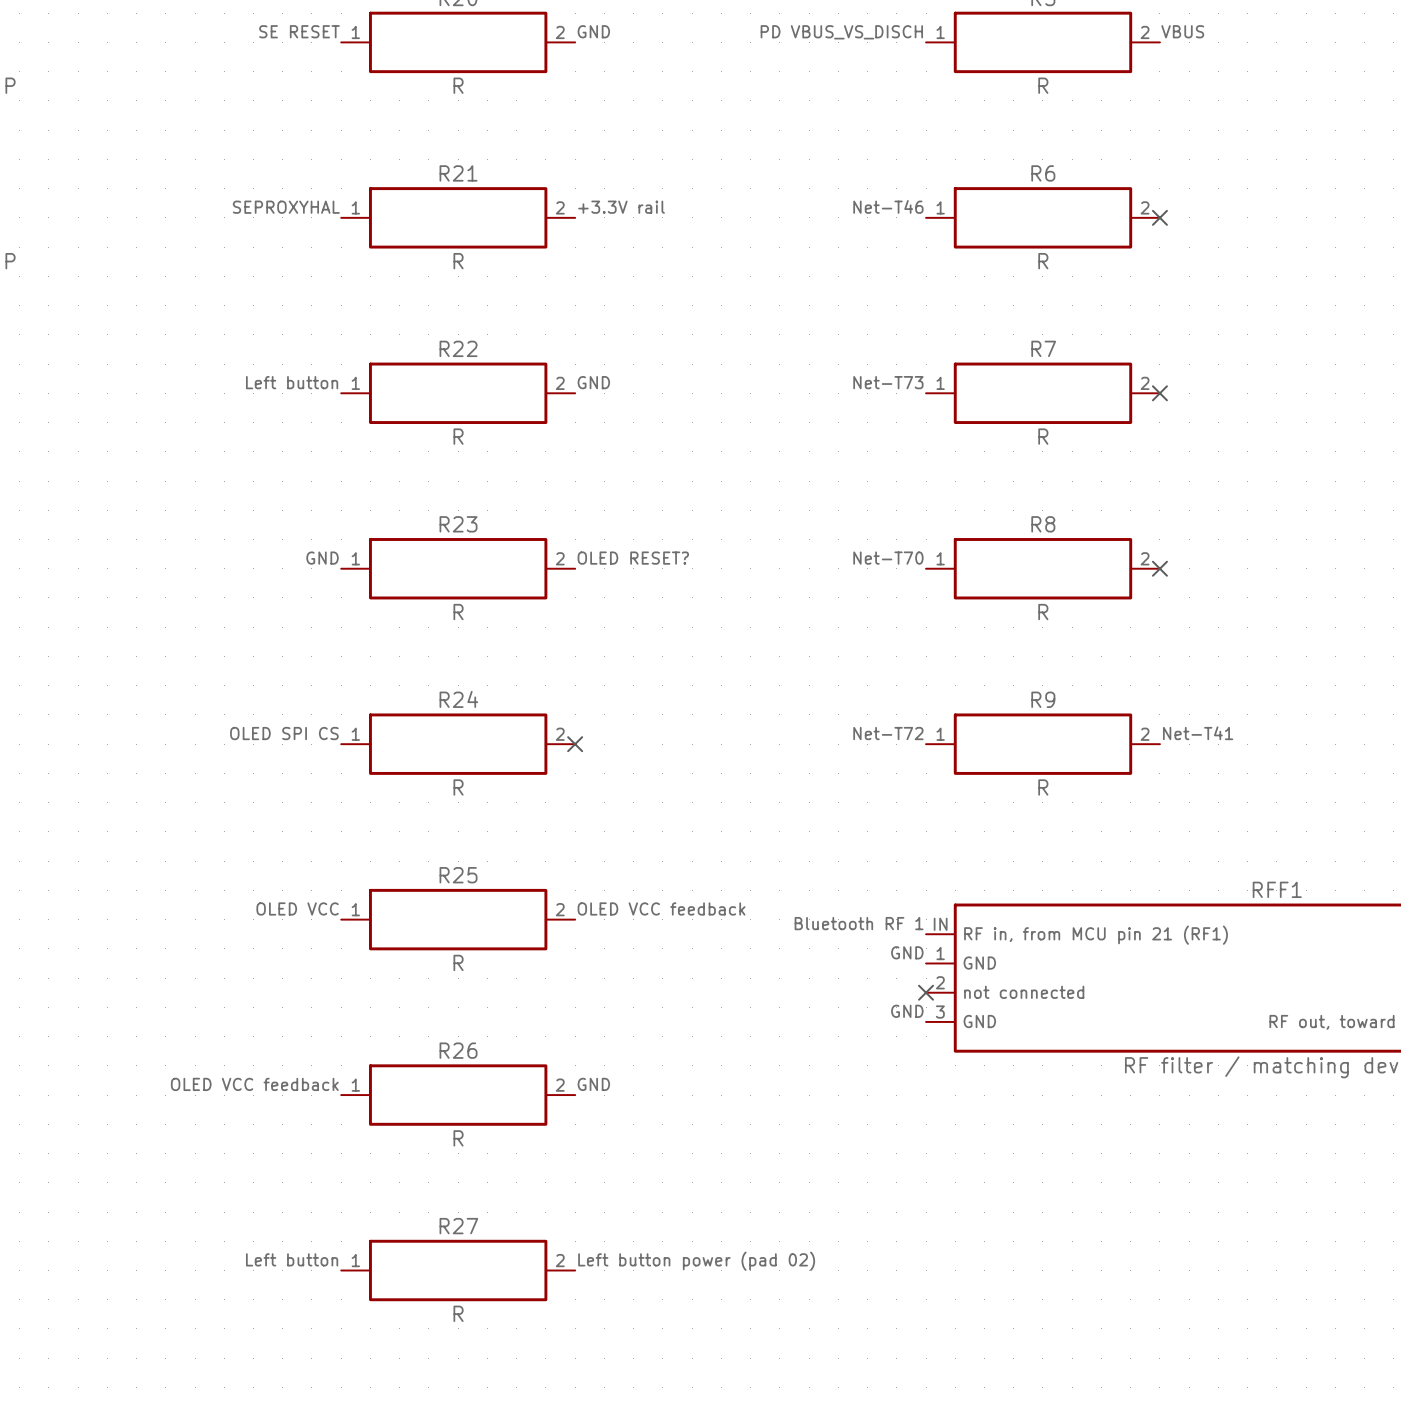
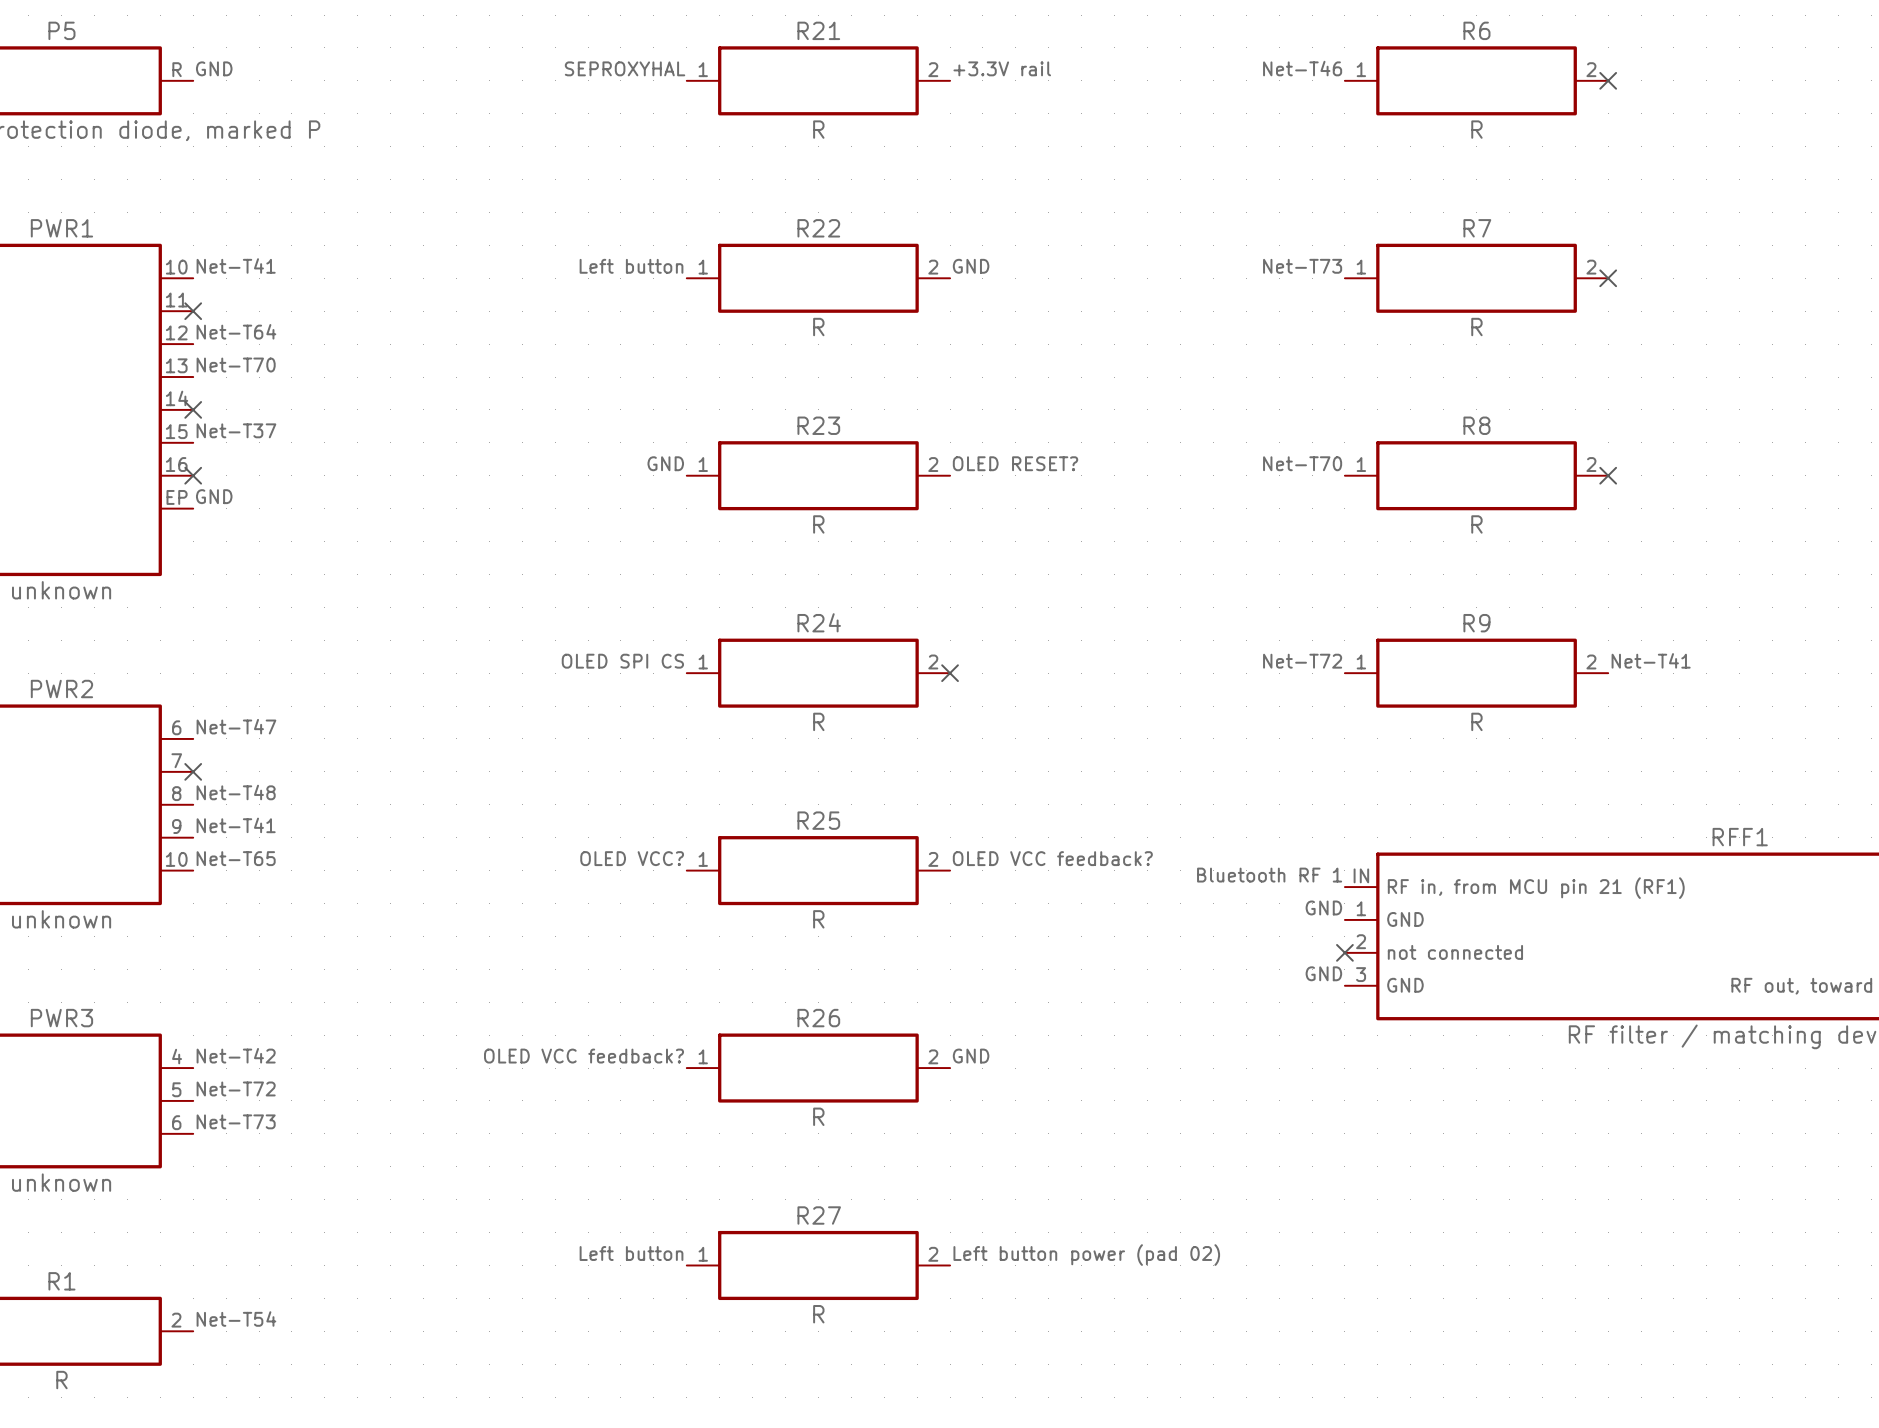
label: OLED VCC (297, 908) -> OLED VCC? (632, 858)
label: OLED VCC feedback (661, 908) -> OLED VCC feedback? (1052, 858)
label: OLED VCC feedback (254, 1084) -> OLED VCC feedback? (584, 1056)

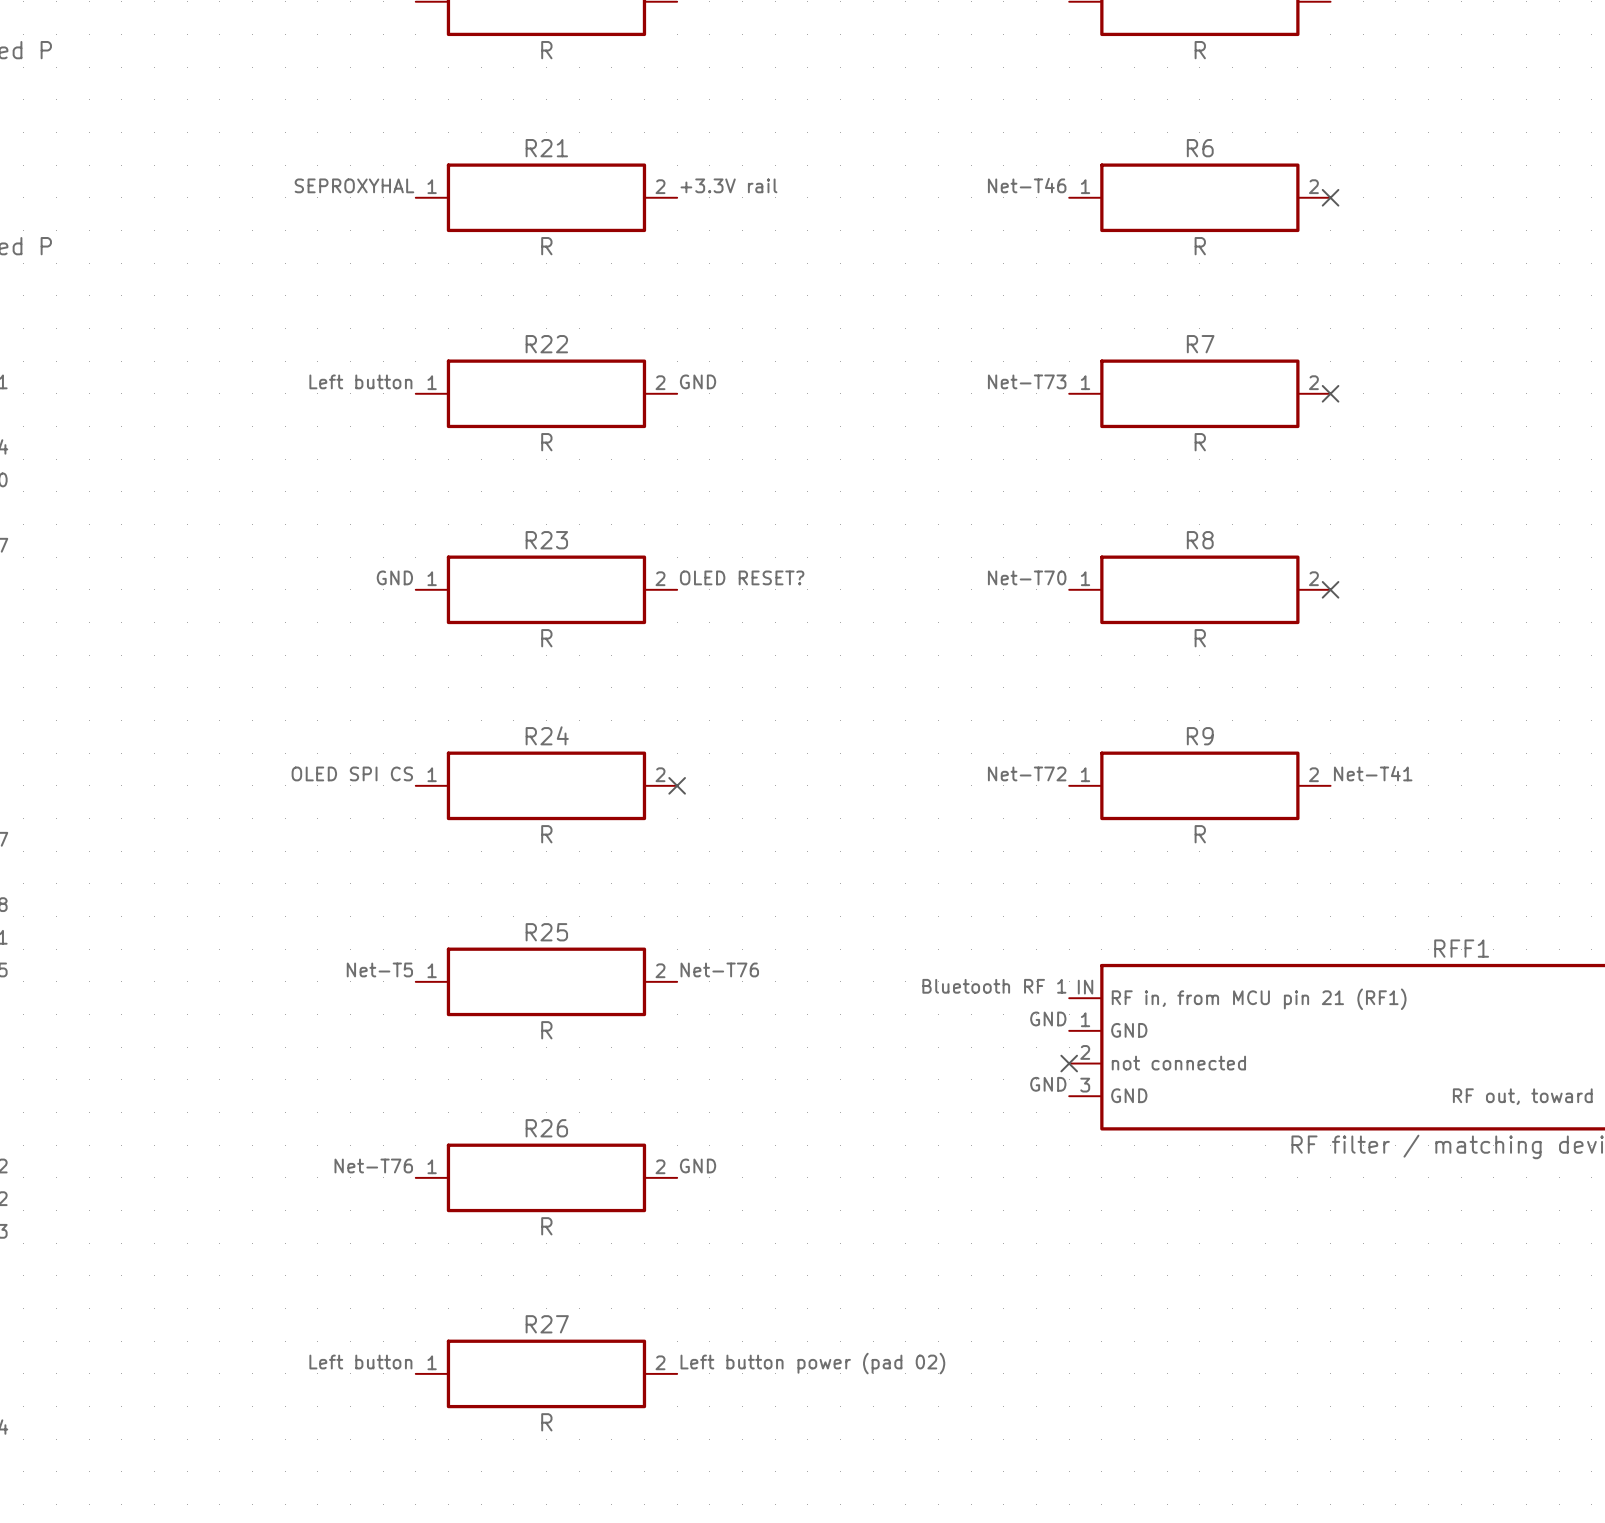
label: OLED VCC? (632, 858) -> Net-T5 (379, 969)
label: OLED VCC feedback? (1052, 858) -> Net-T76 (719, 969)
label: OLED VCC feedback? (584, 1056) -> Net-T76 (373, 1165)

